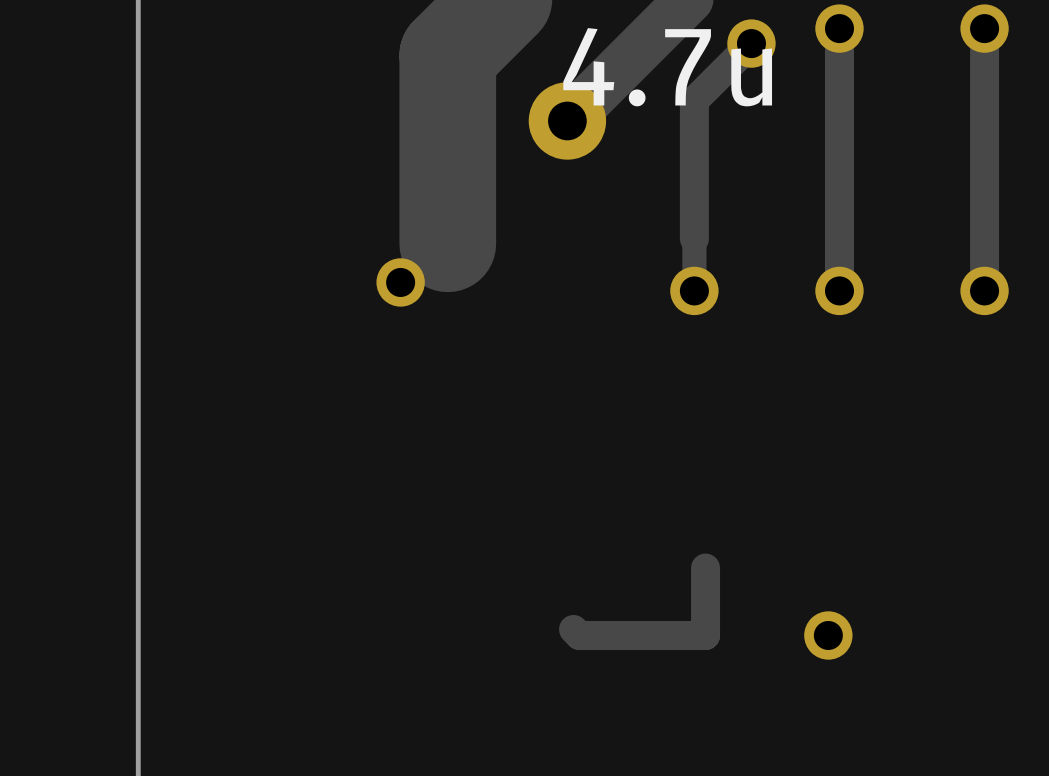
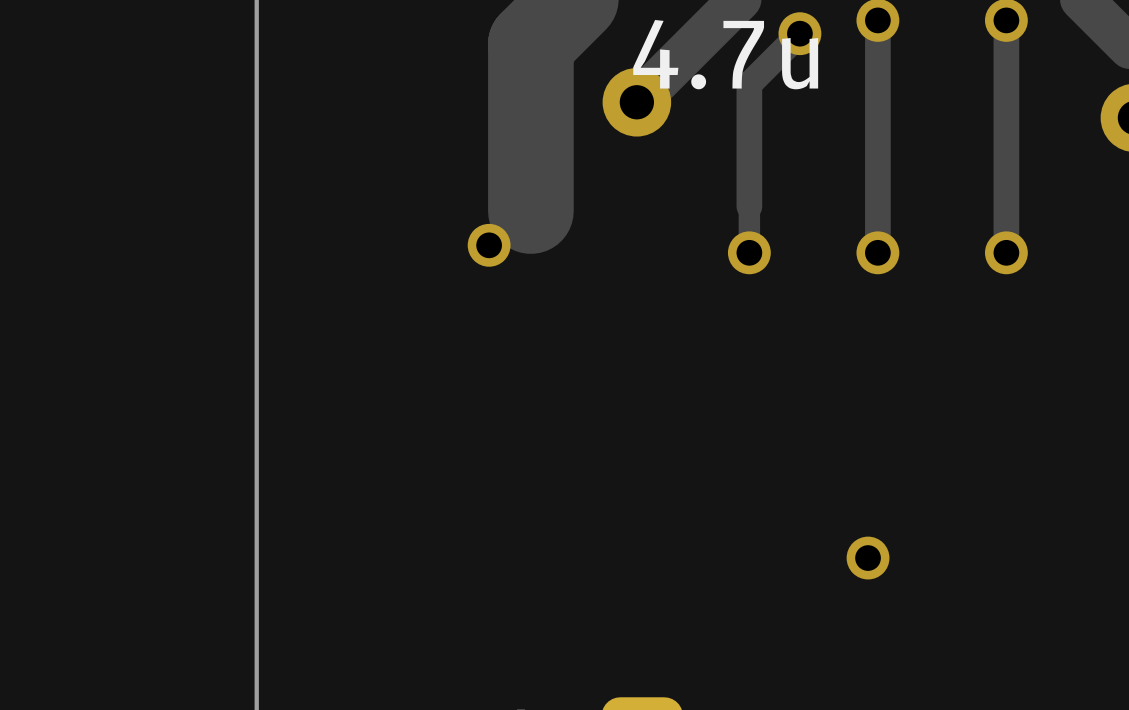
track: (705, 568) (705, 635) (579, 635) (573, 629) -> none

